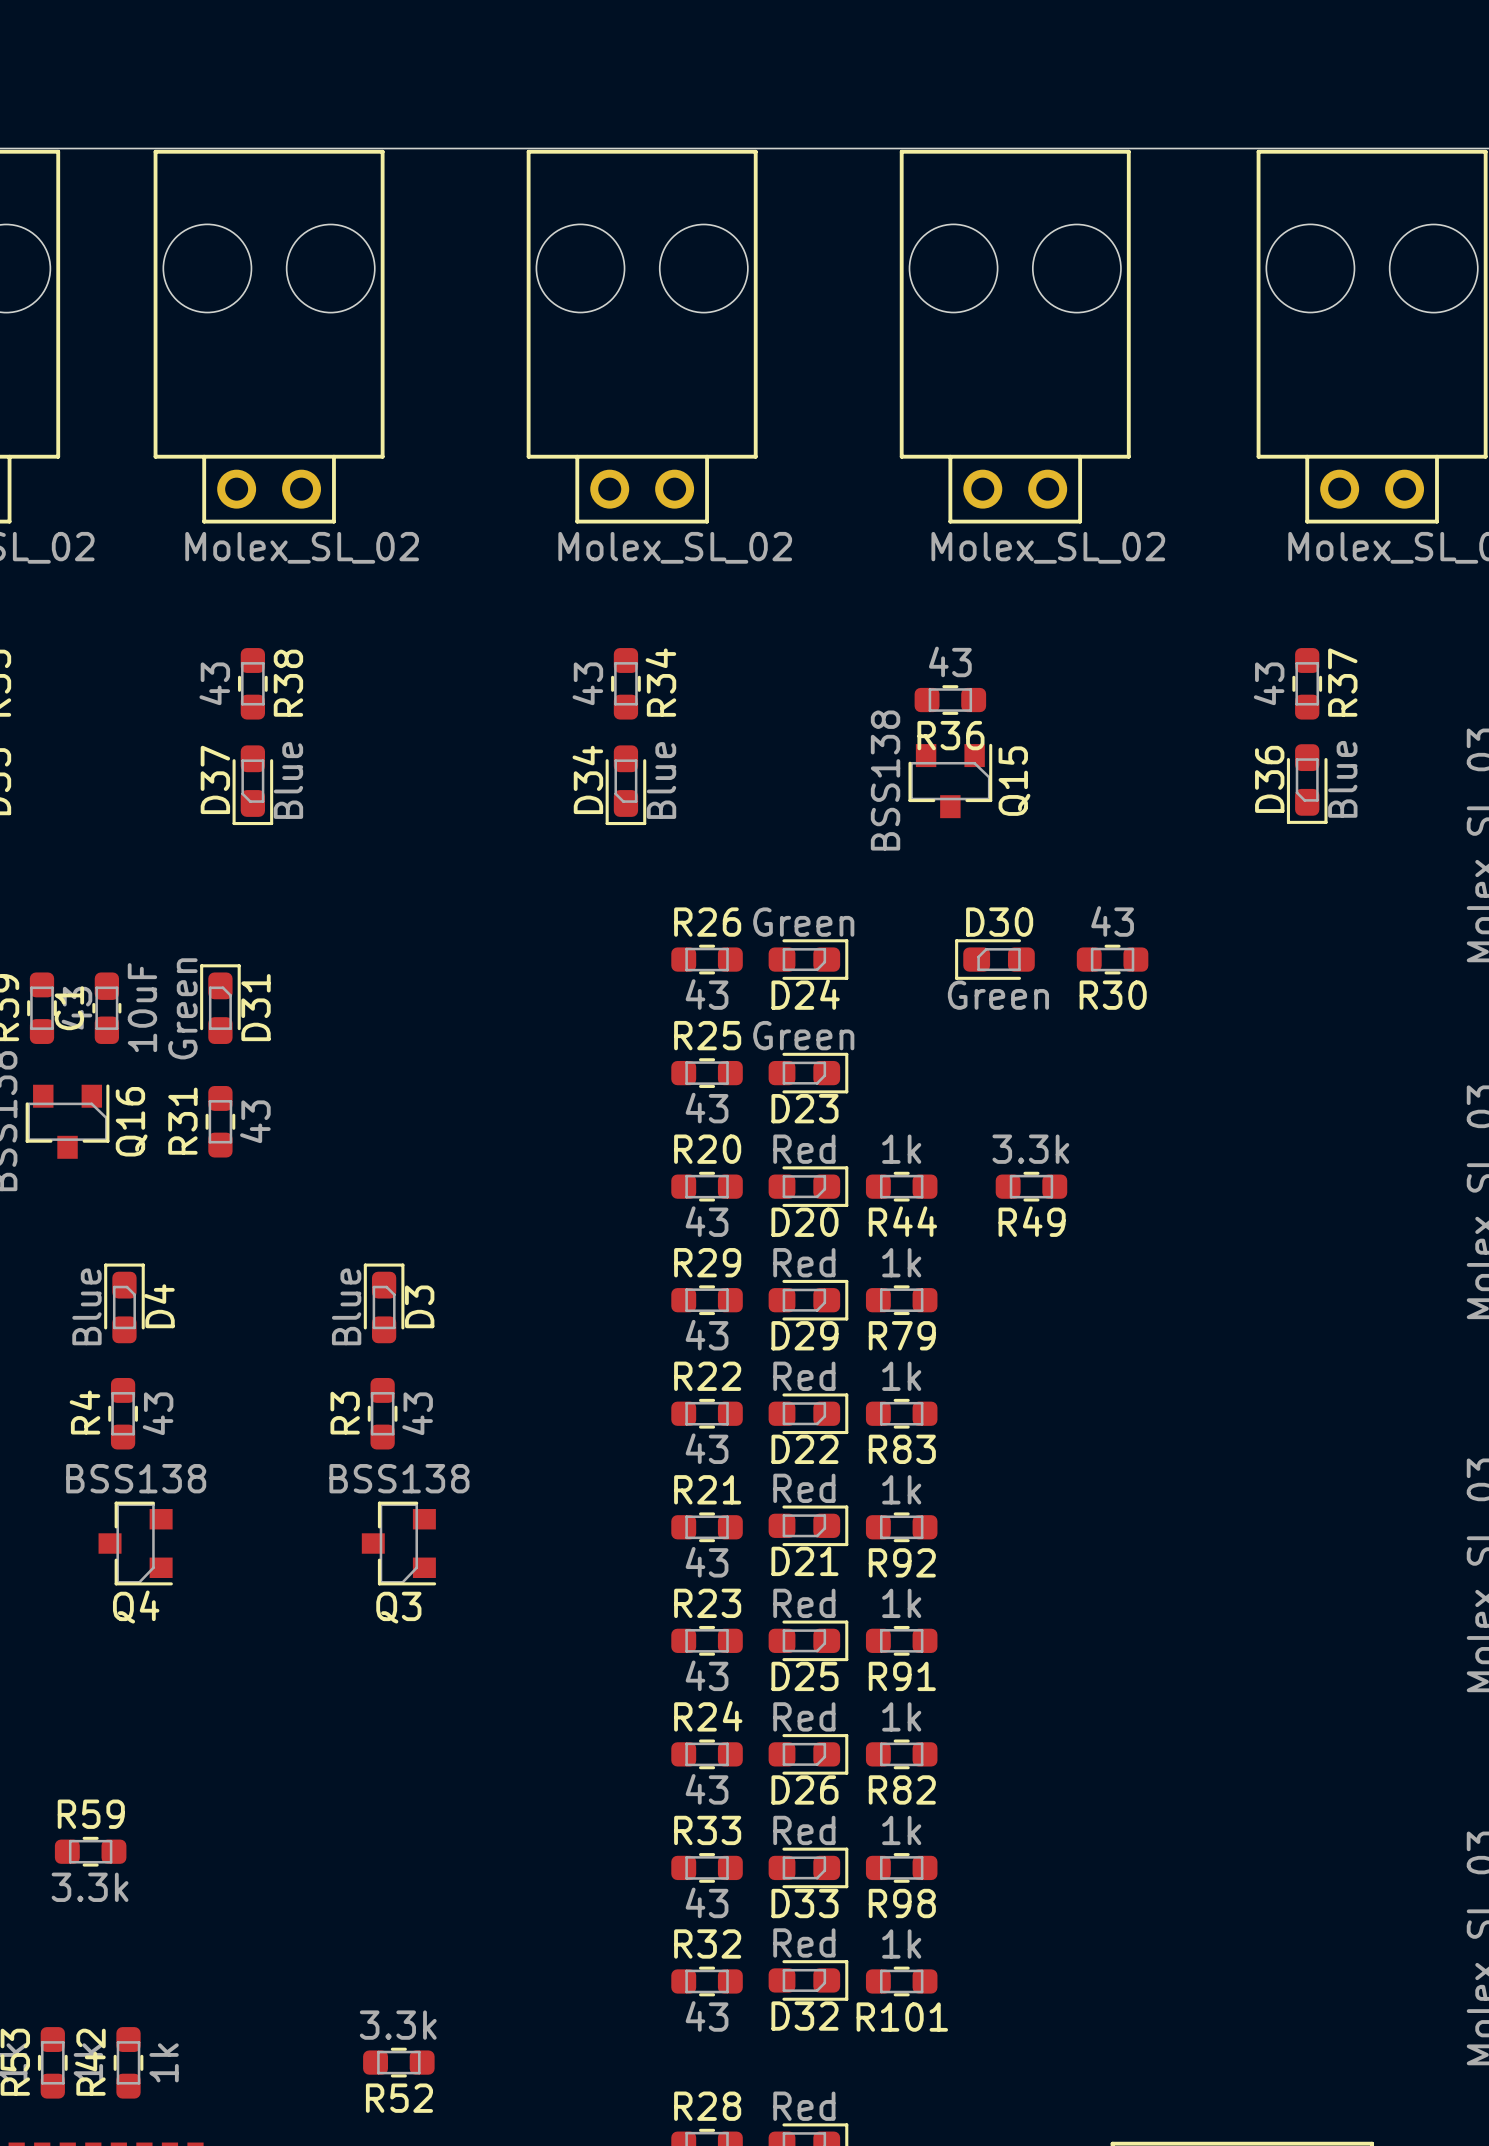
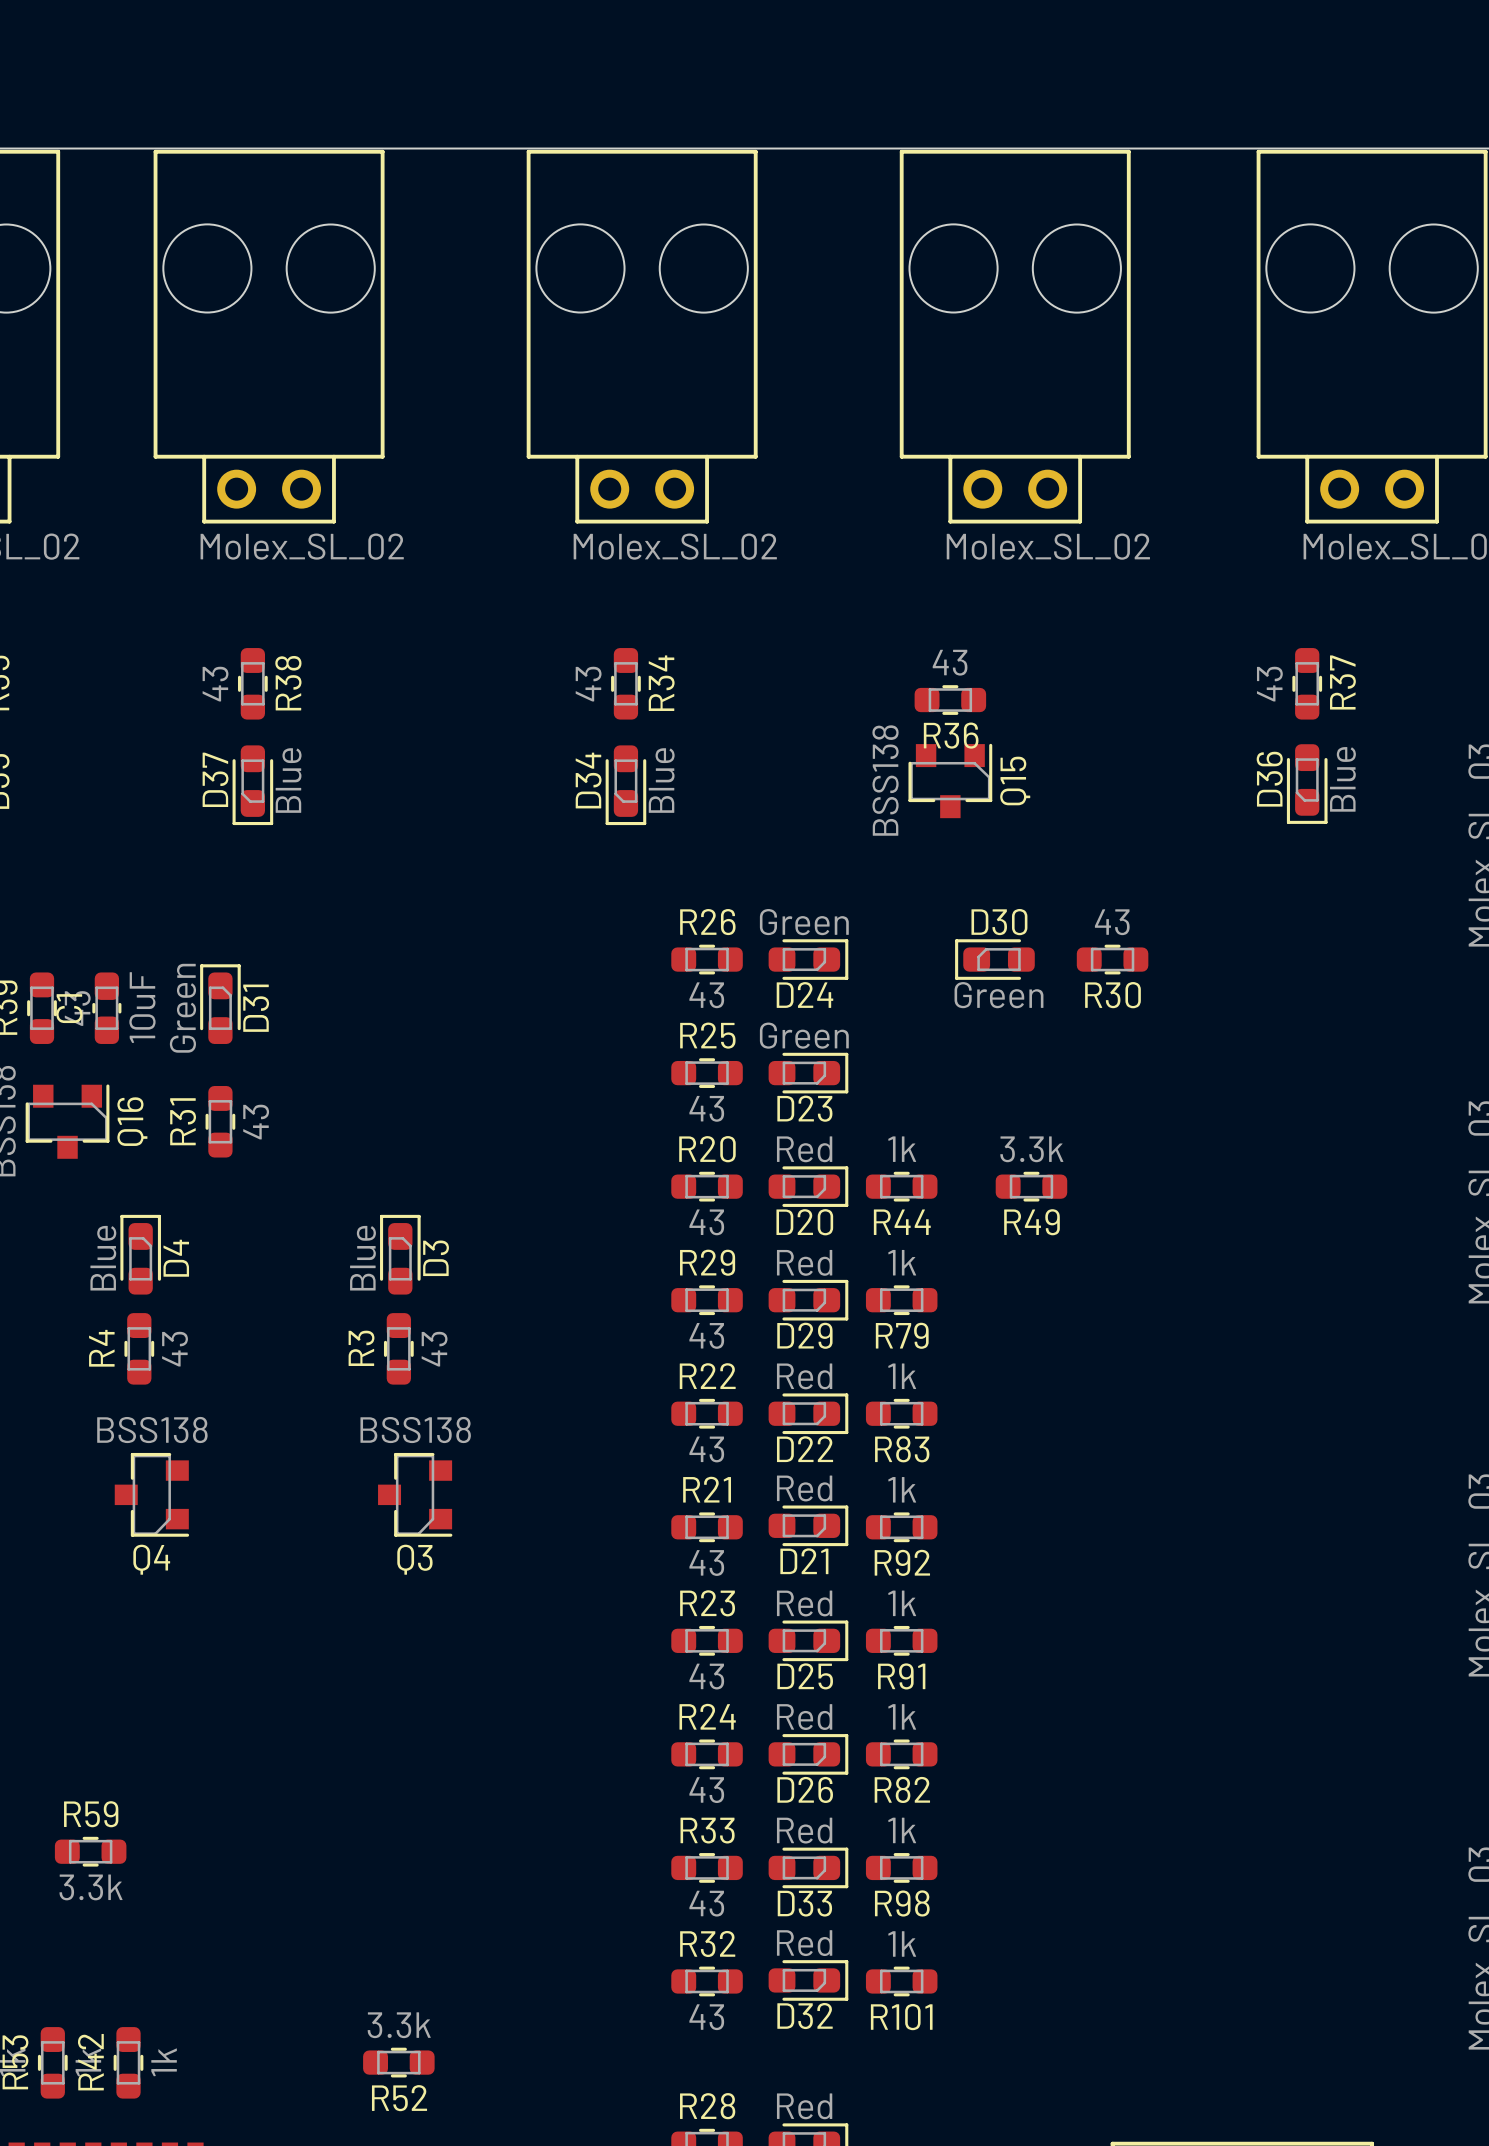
D4 position: (124, 1303) -> (140, 1254)
D3 position: (384, 1303) -> (400, 1254)
R4 position: (123, 1413) -> (139, 1348)
R3 position: (382, 1413) -> (398, 1348)
Q4 position: (135, 1543) -> (151, 1494)
Q3 position: (398, 1543) -> (415, 1494)

